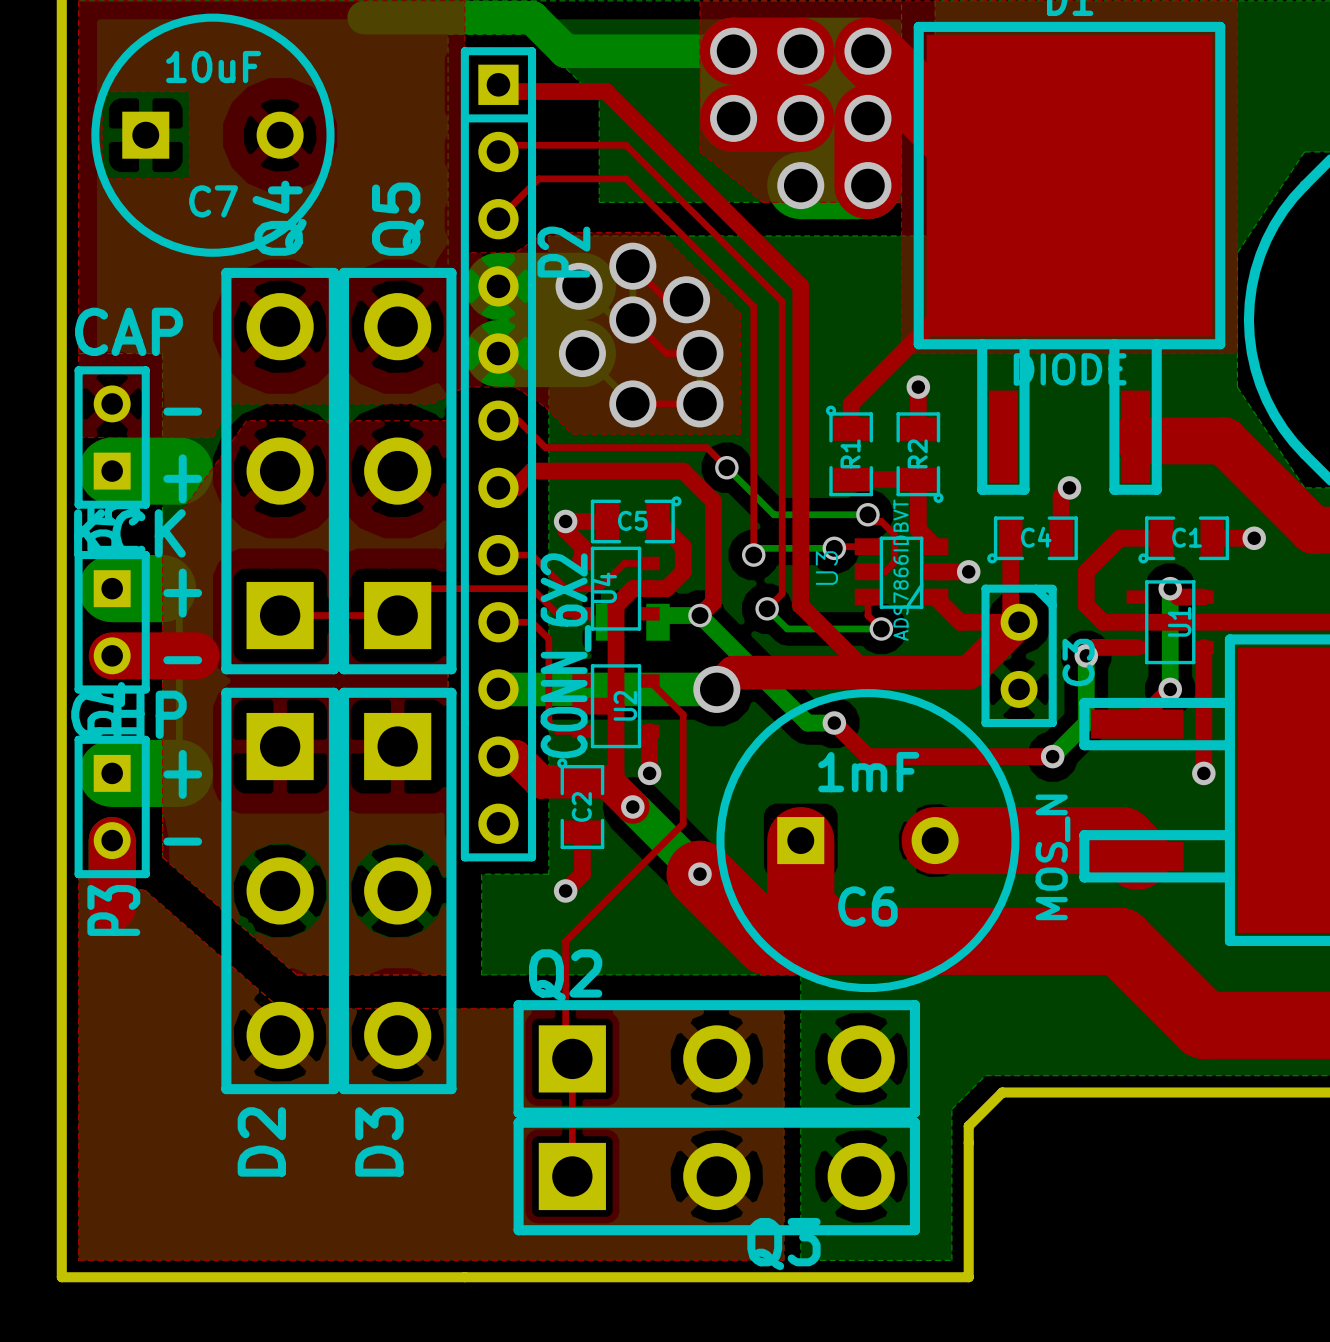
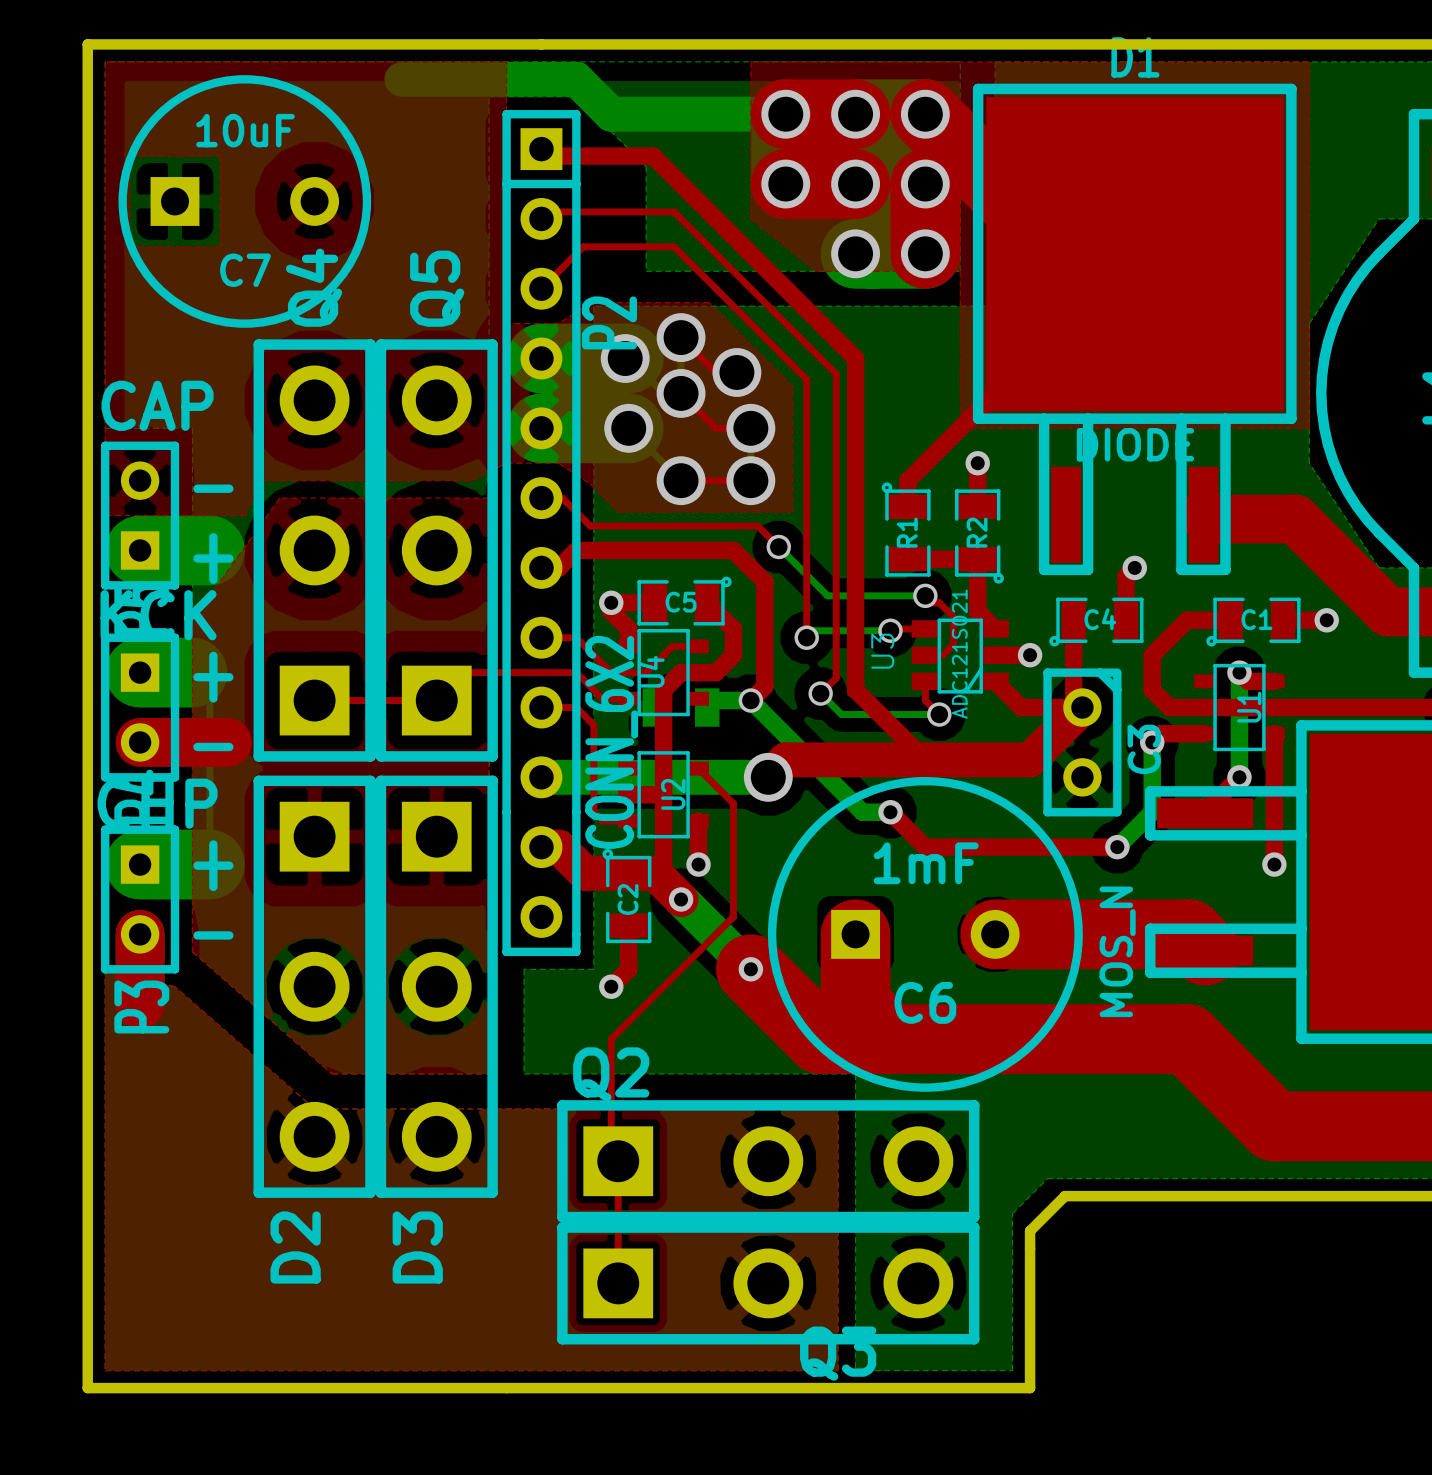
U3 value: ADS7866IDBVT (901, 570) -> ADC121S021 (959, 654)

